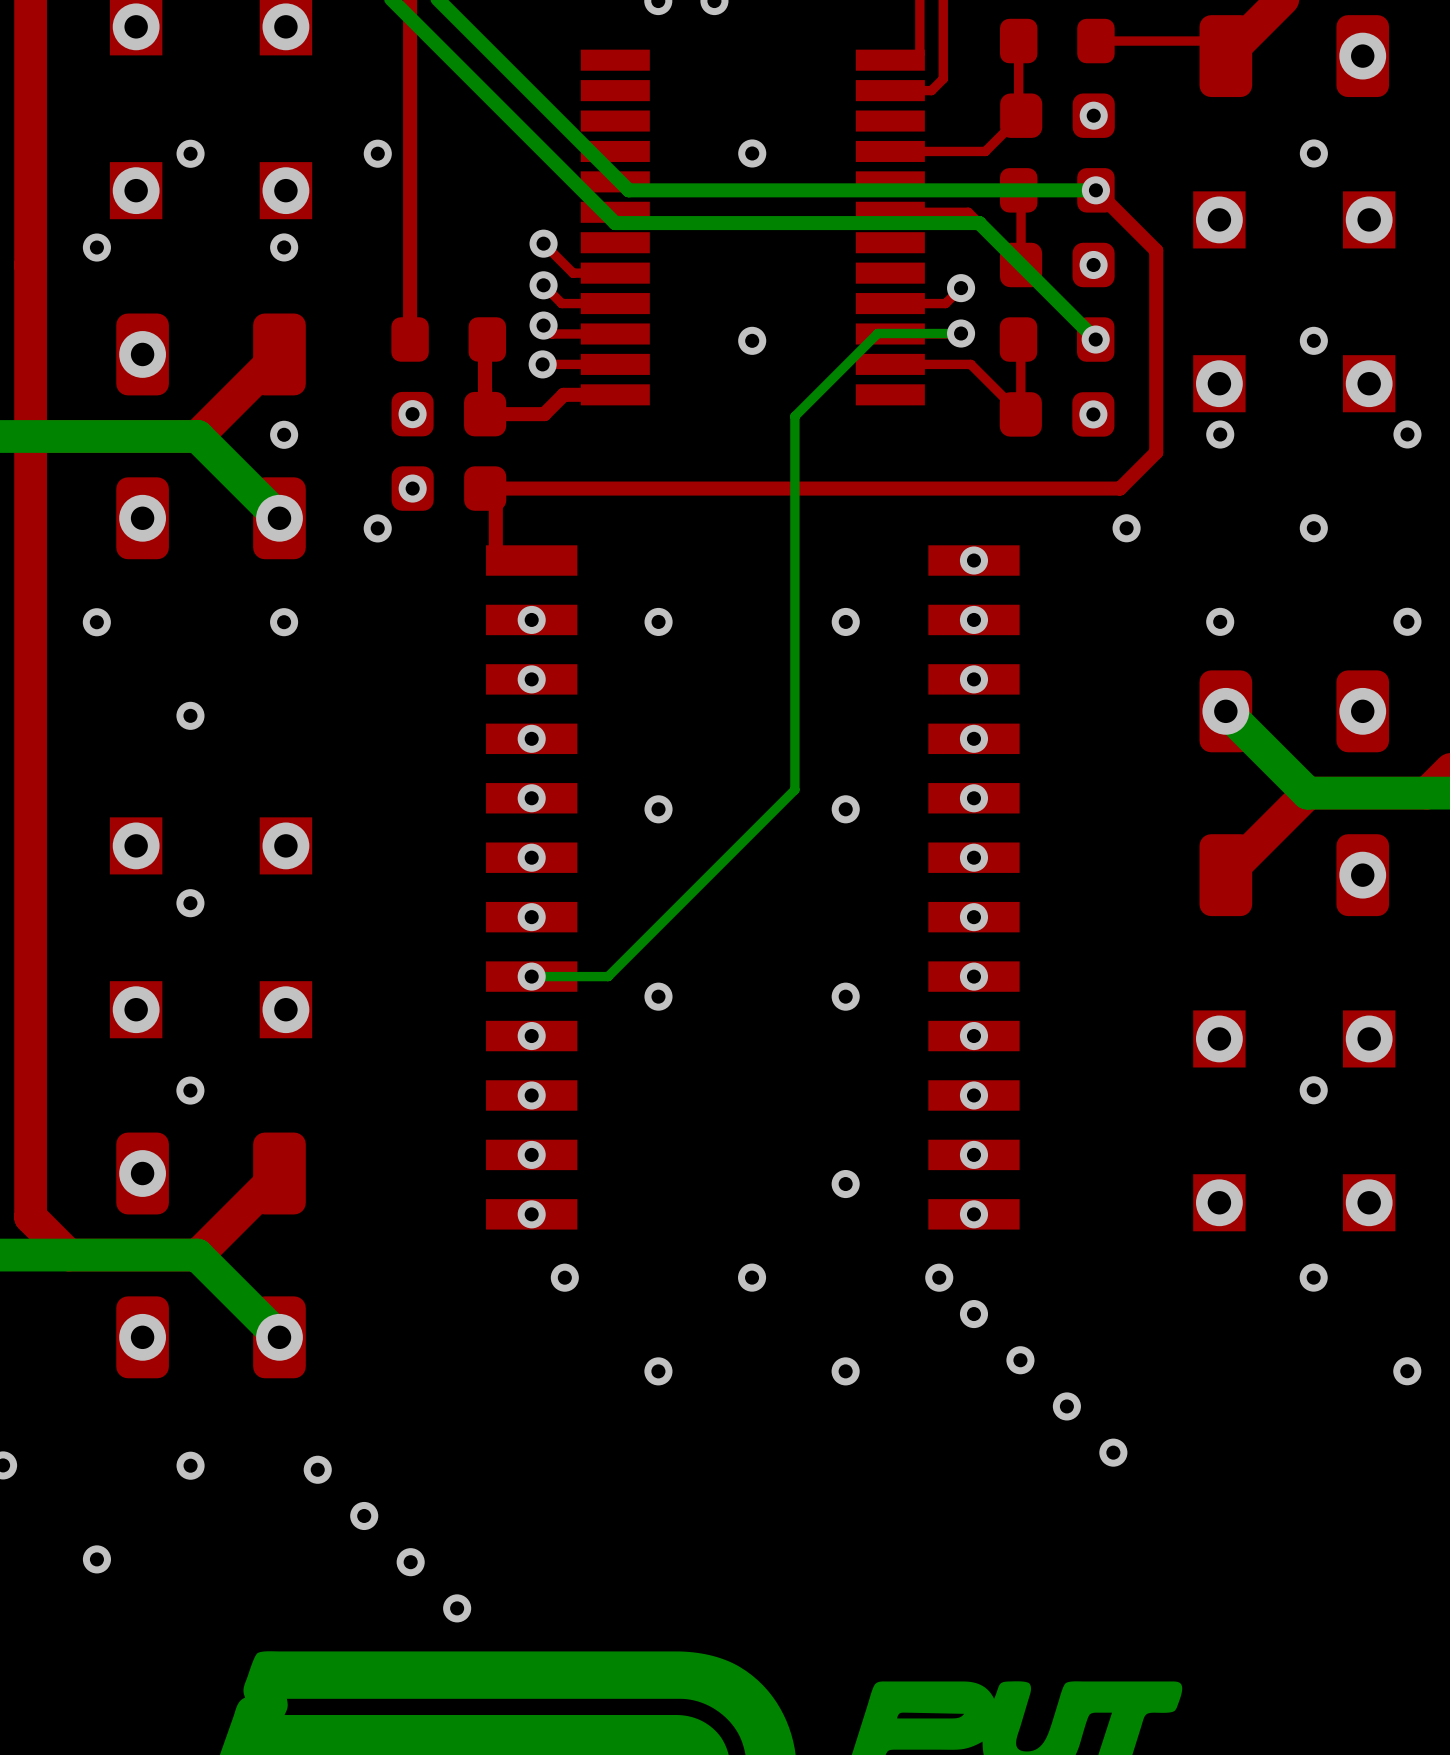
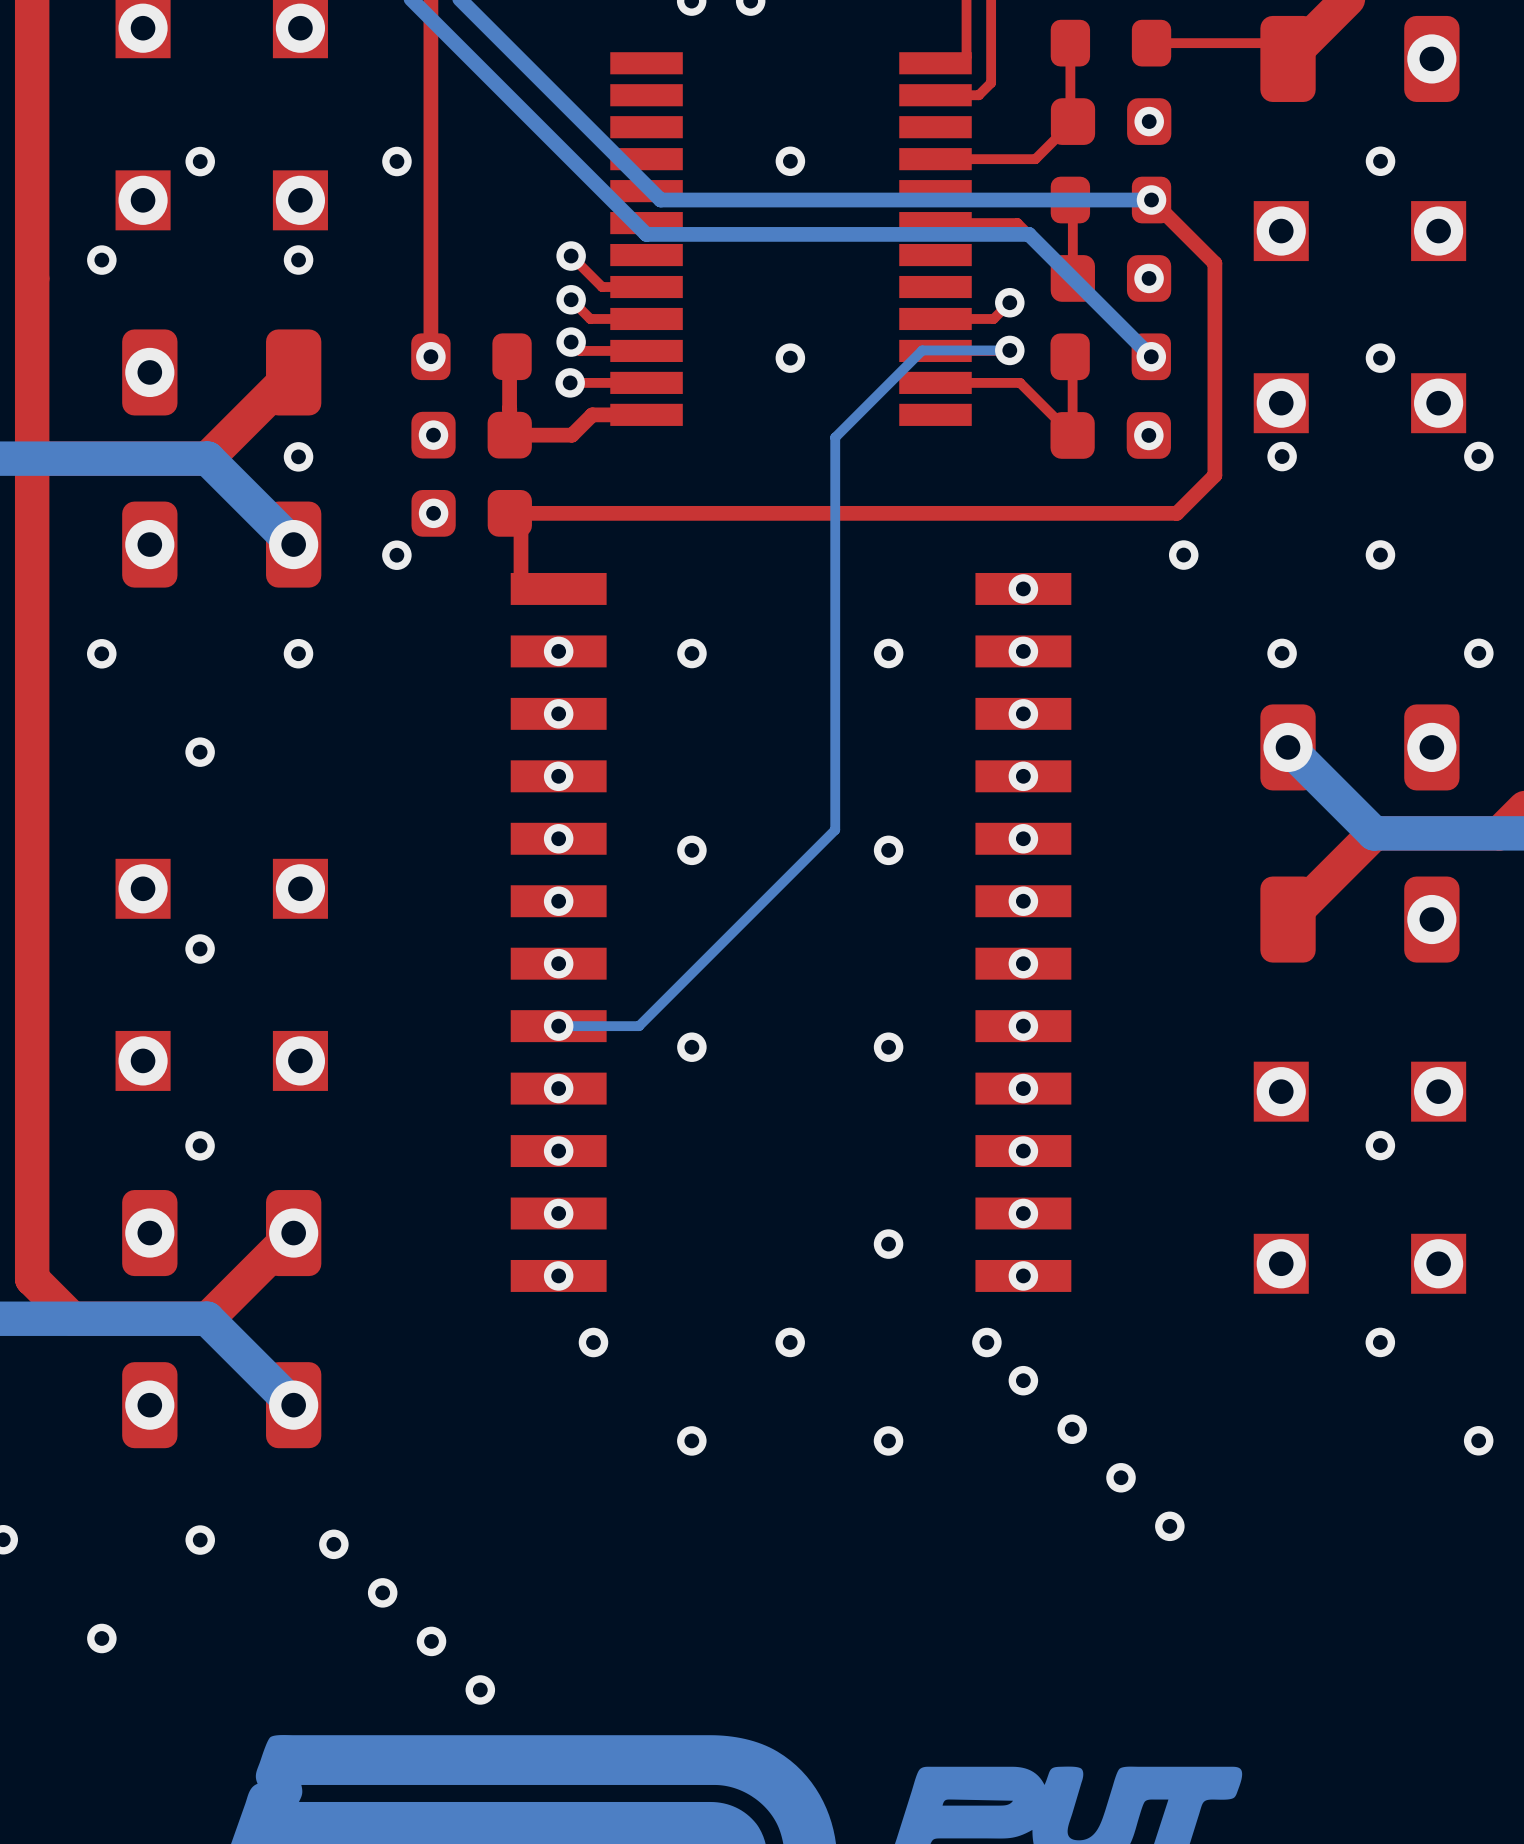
via: none -> (430, 356)
via: none -> (293, 1233)

